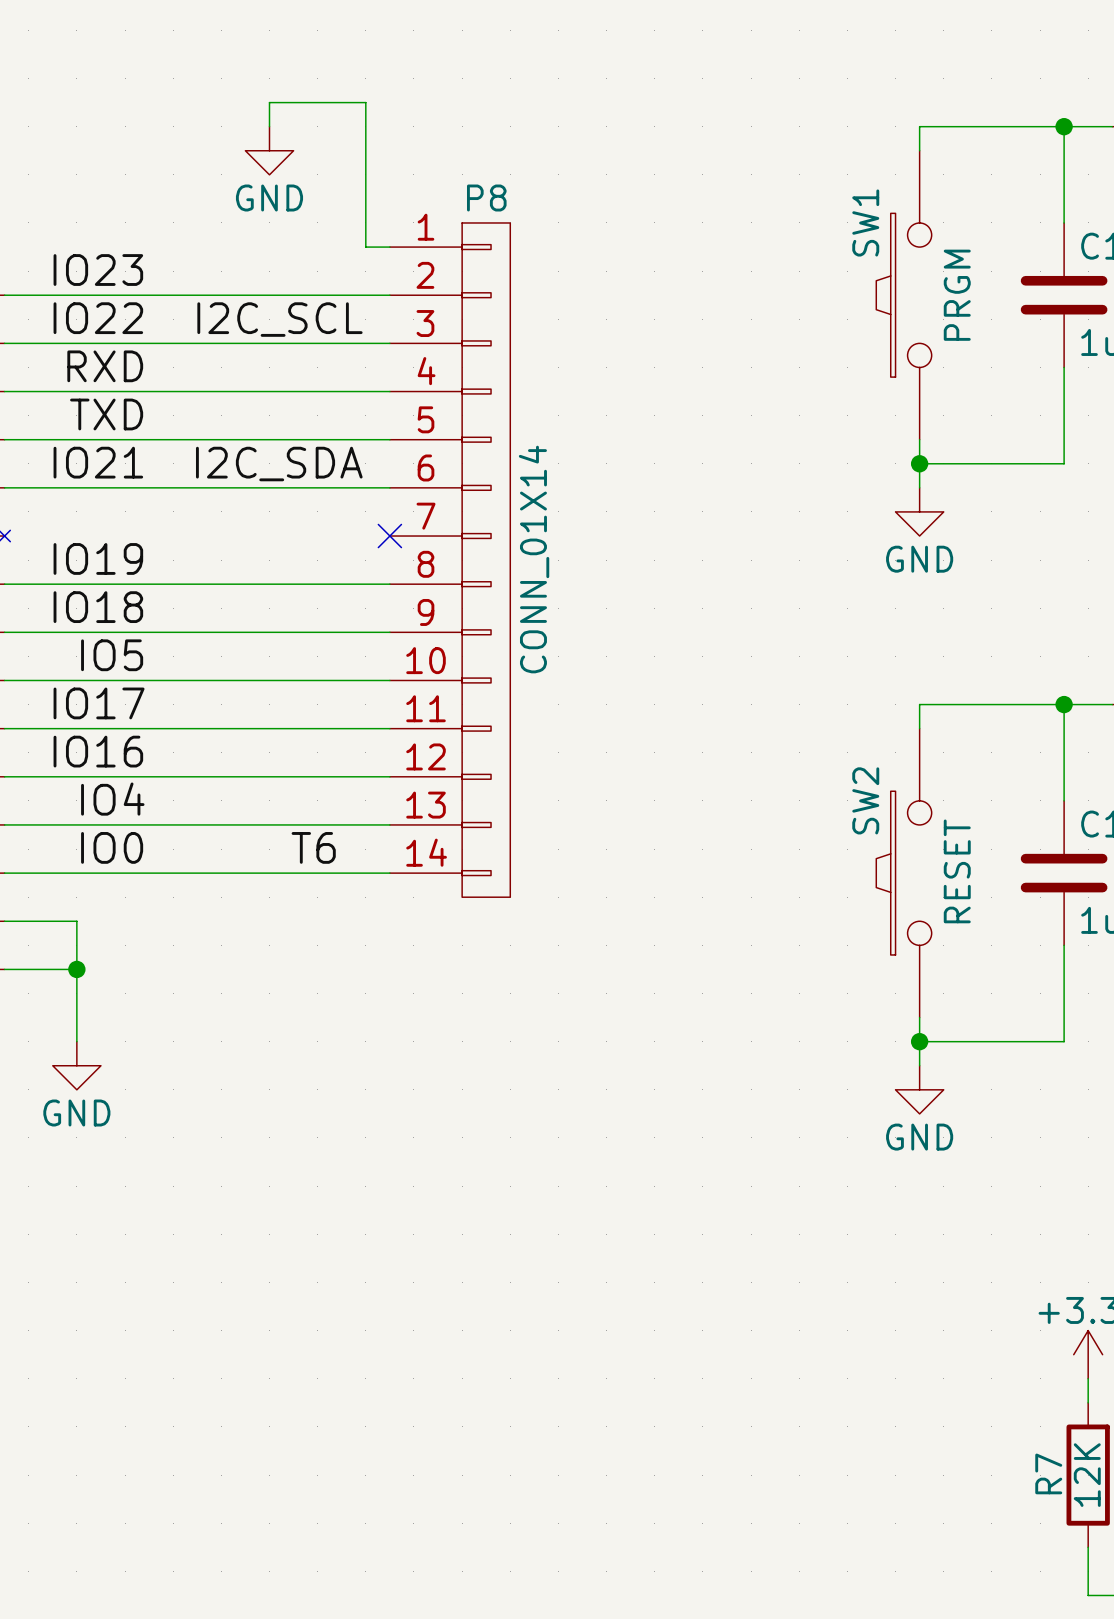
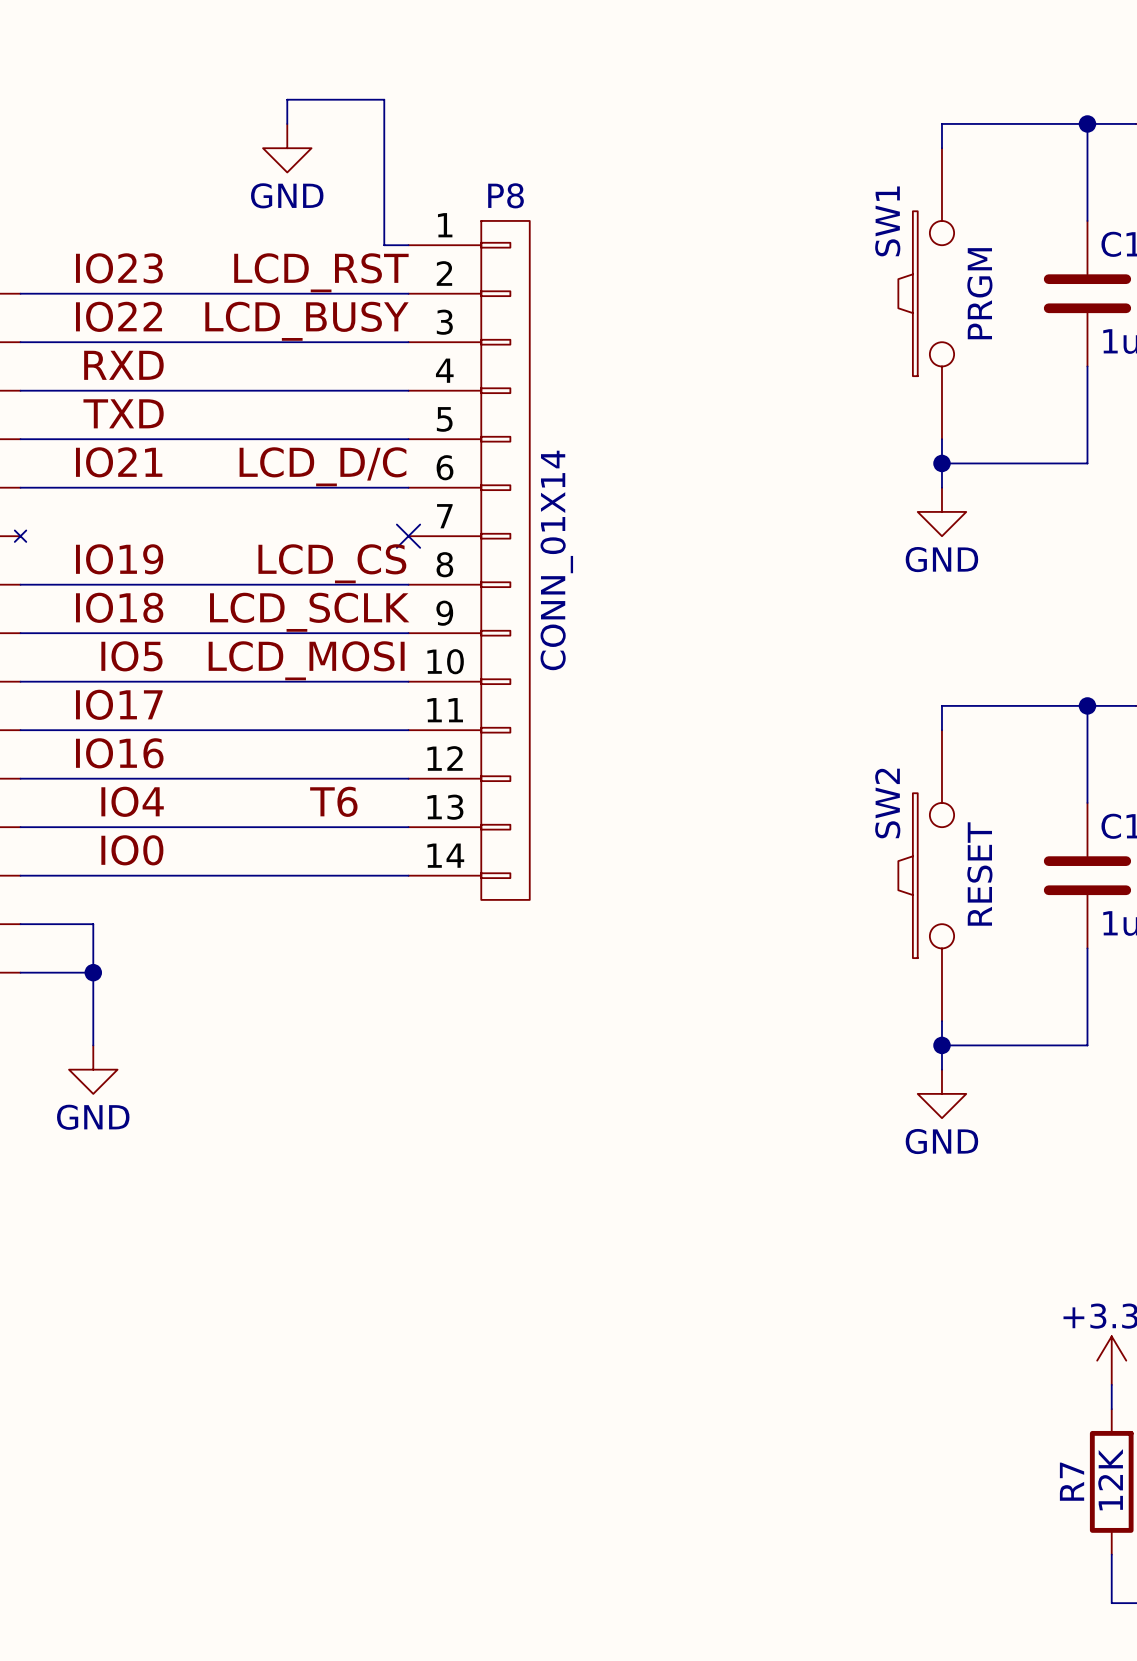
label: none -> LCD_RST (321, 272)
label: I2C_SCL (279, 319) -> none
label: none -> LCD_BUSY (306, 321)
label: I2C_SDA (279, 464) -> none
label: none -> LCD_D/C (322, 466)
label: none -> LCD_CS (332, 563)
label: none -> LCD_SCLK (309, 612)
label: none -> LCD_MOSI (306, 660)
label position: T6 (313, 847) -> T6 (333, 801)

